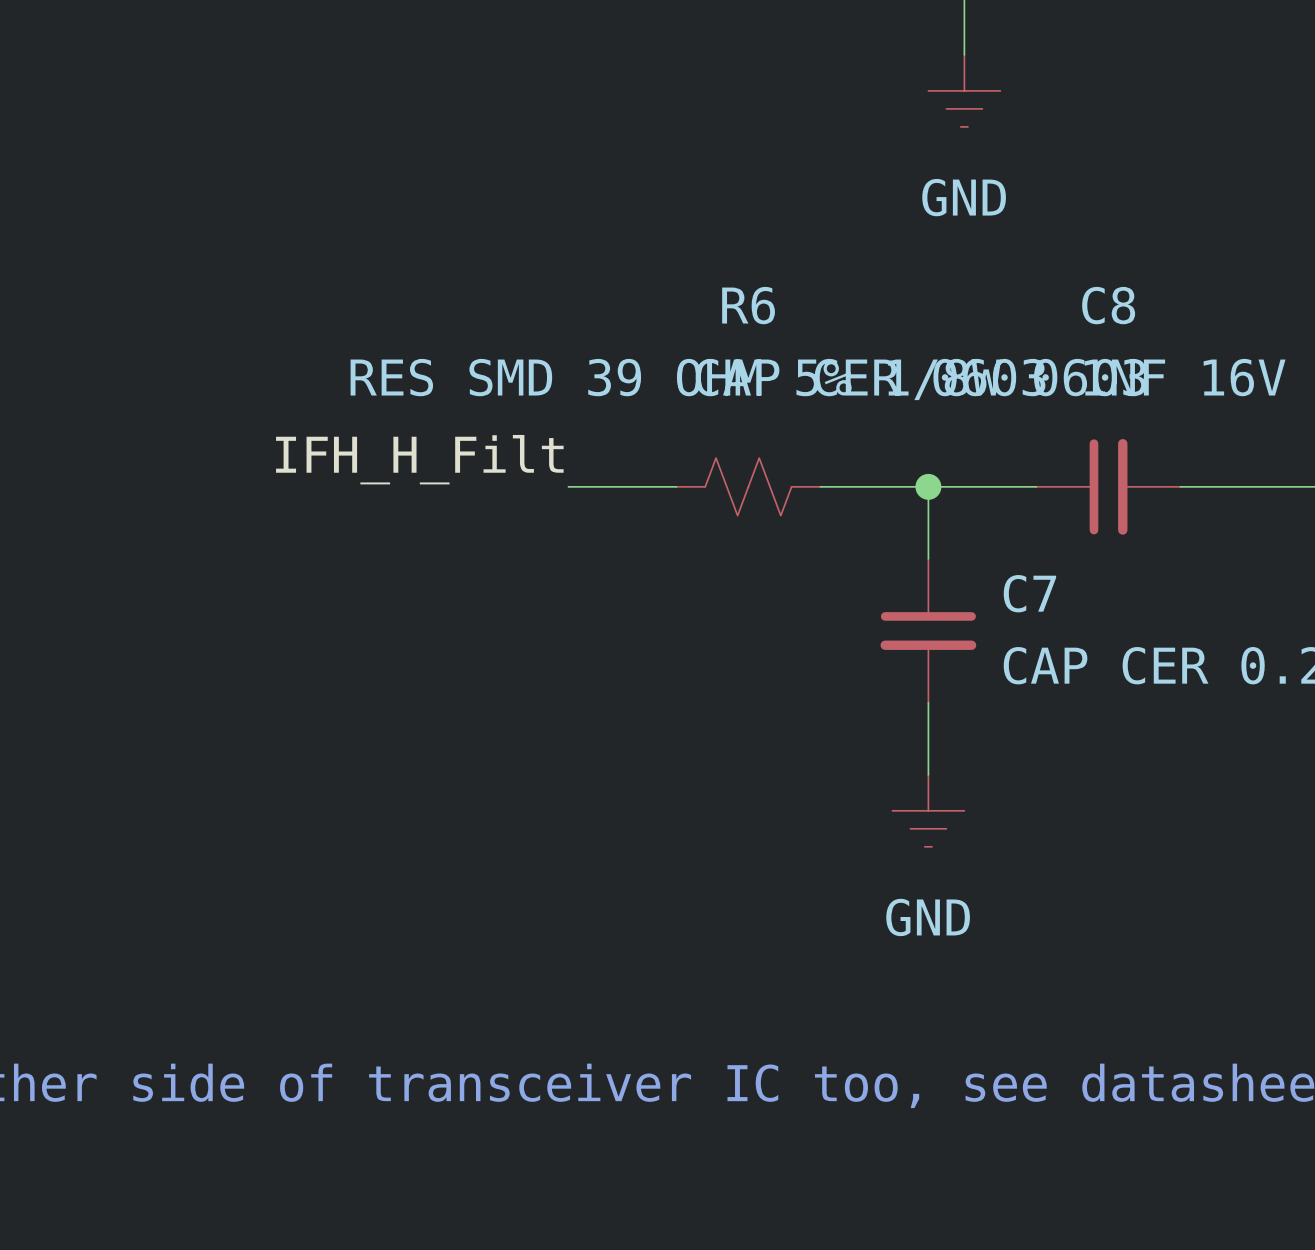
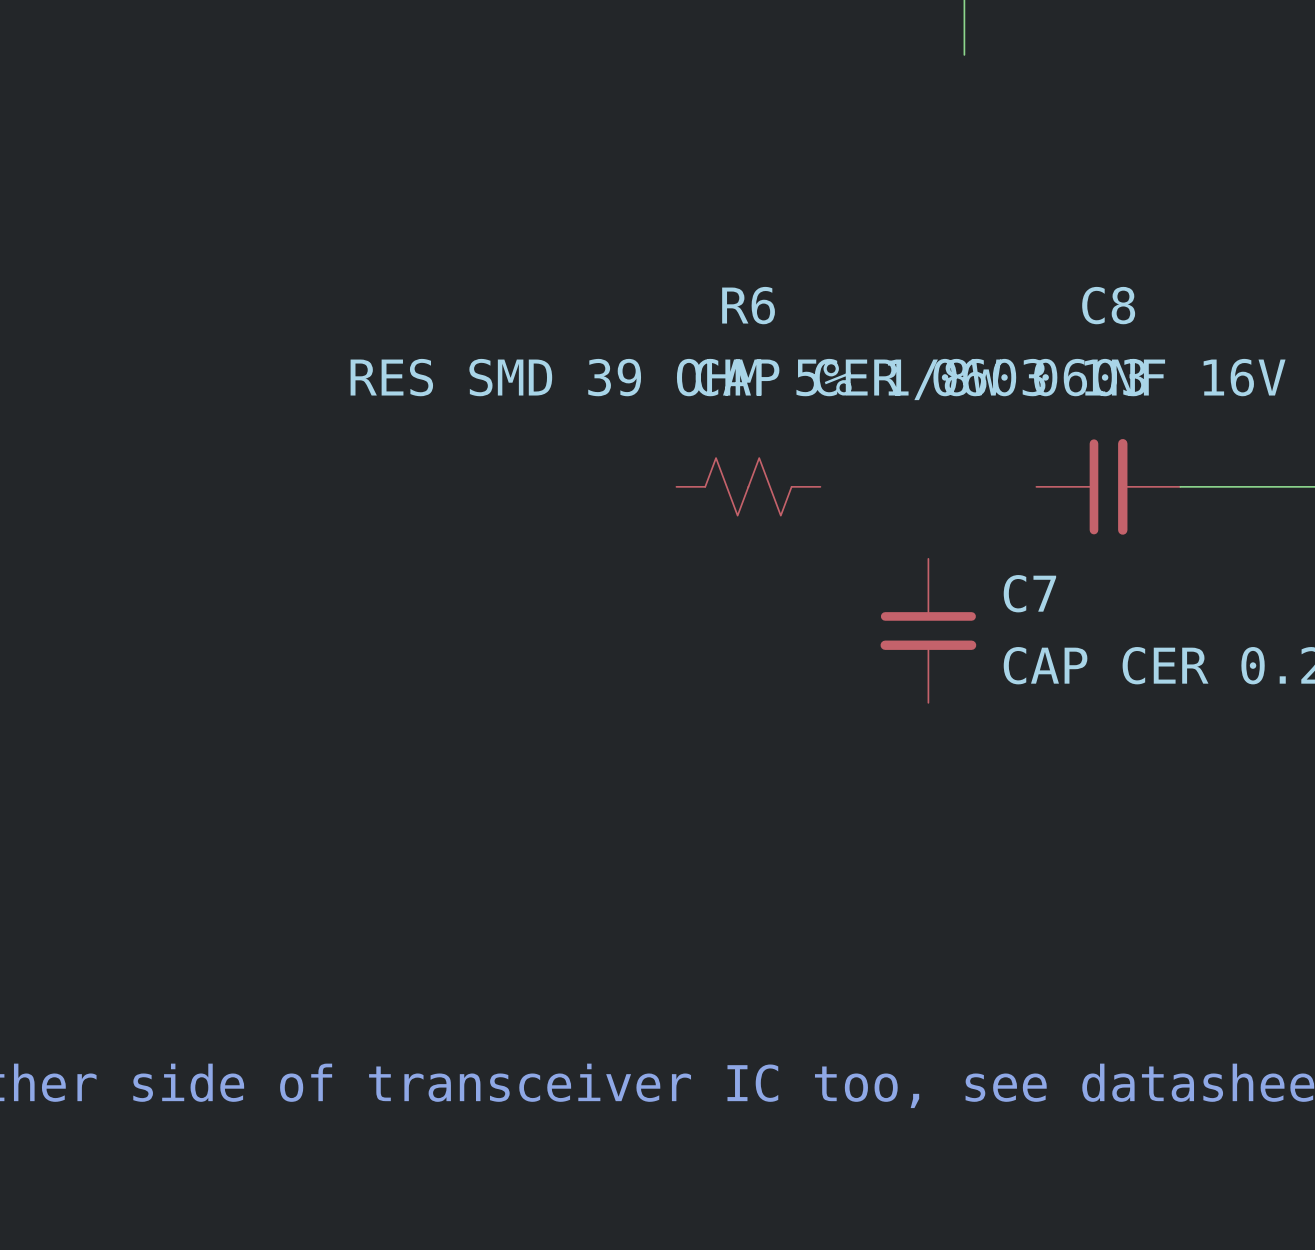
power symbol: GND (964, 90) -> none
label: IFH_H_Filt (419, 459) -> none
wire: (568, 486) (676, 486) -> none
wire: (820, 486) (1036, 486) -> none
wire: (928, 486) (928, 558) -> none
junction: (928, 486) -> none
wire: (928, 702) (928, 774) -> none
power symbol: GND (928, 810) -> none

